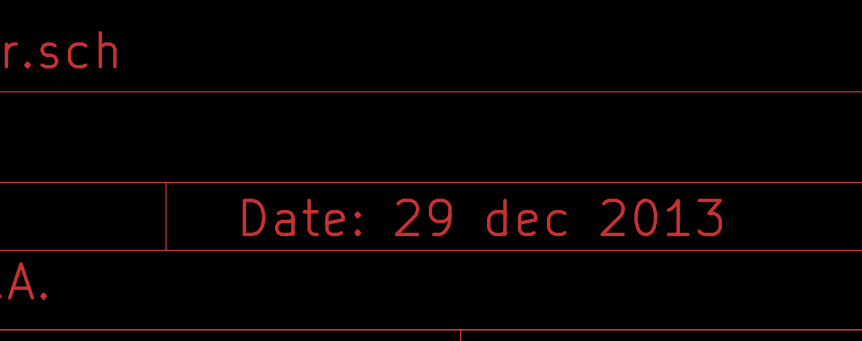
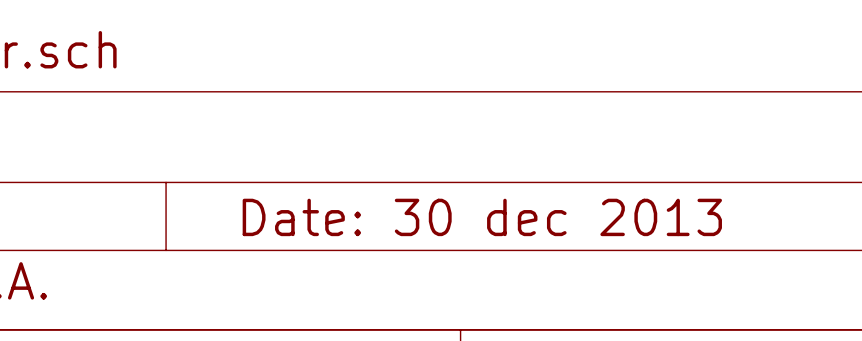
title block: Date: 29 dec 2013 (482, 217) -> Date: 30 dec 2013 (482, 217)

